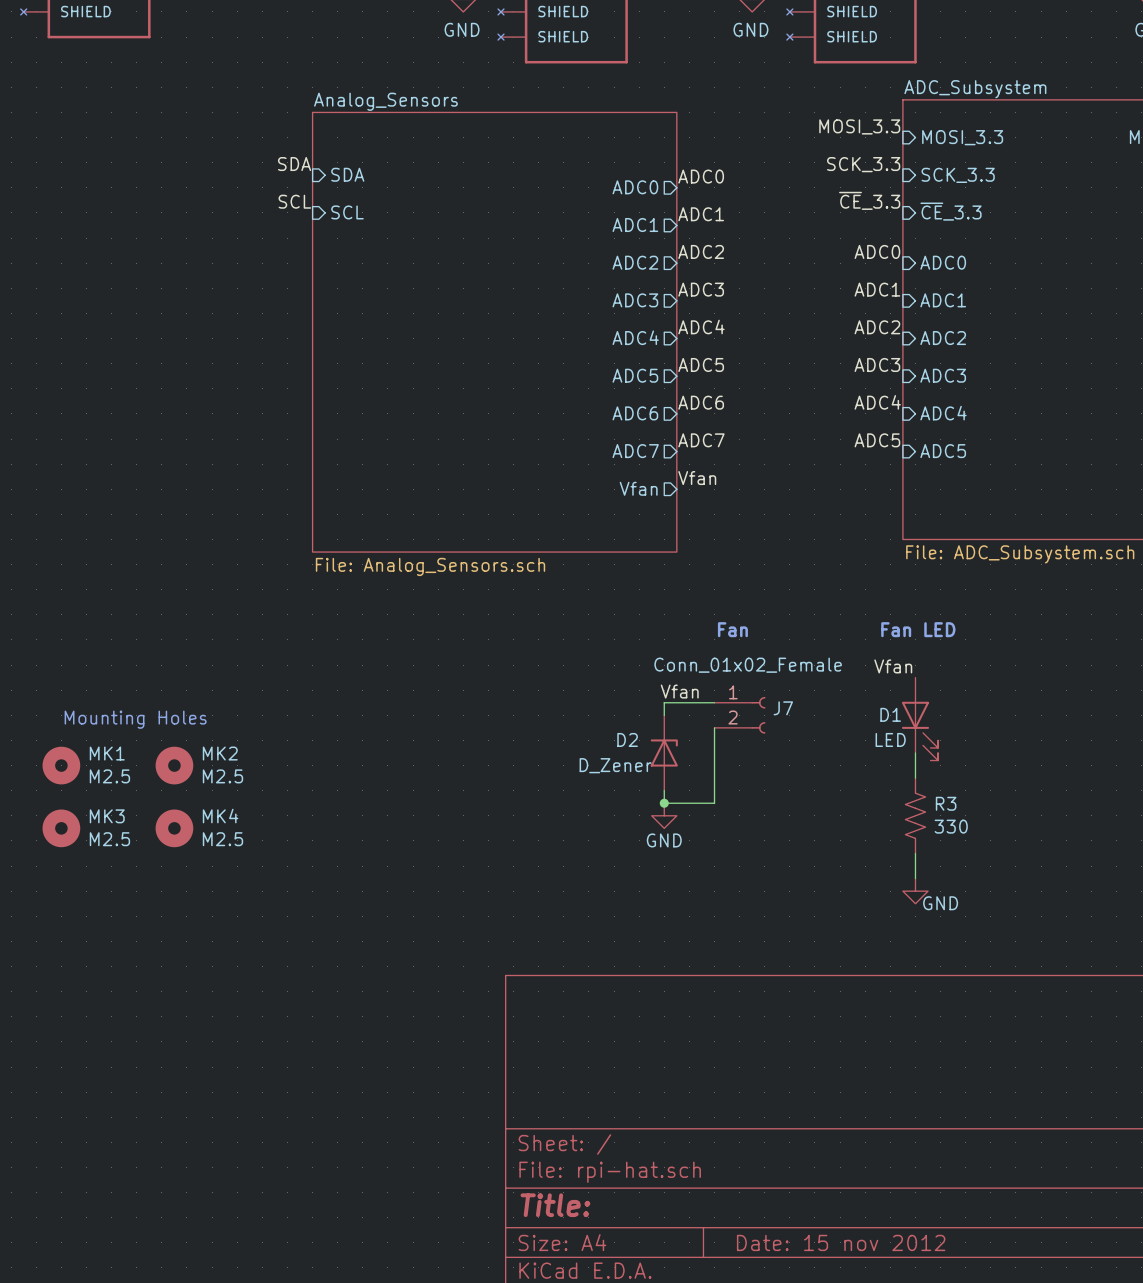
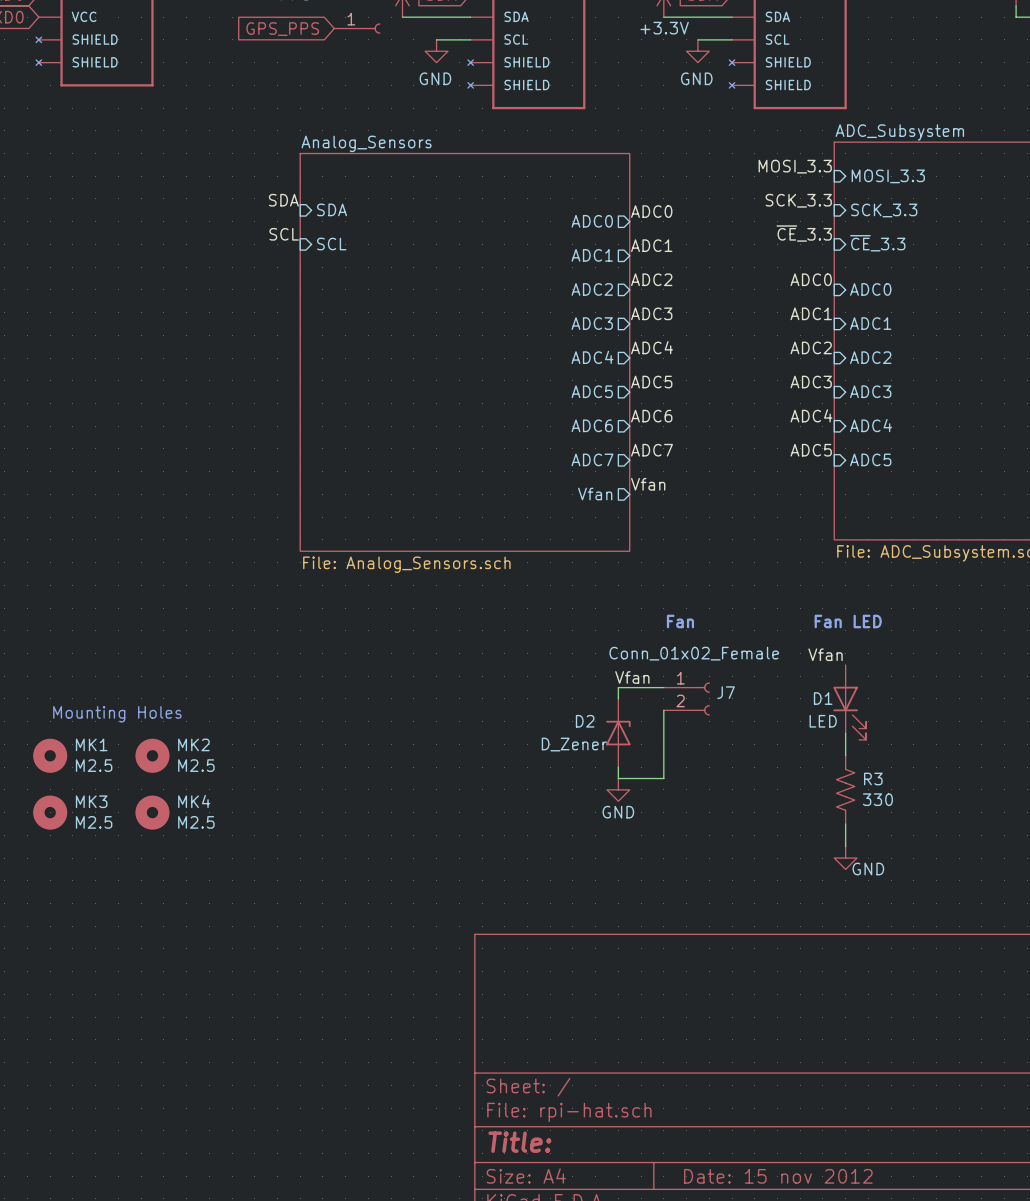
text position: Mounting Holes (135, 719) -> Mounting Holes (117, 714)
MK1 position: (61, 765) -> (50, 755)
MK2 position: (174, 765) -> (152, 755)
junction: (664, 803) -> none
MK3 position: (61, 828) -> (50, 812)
MK4 position: (174, 828) -> (152, 812)

